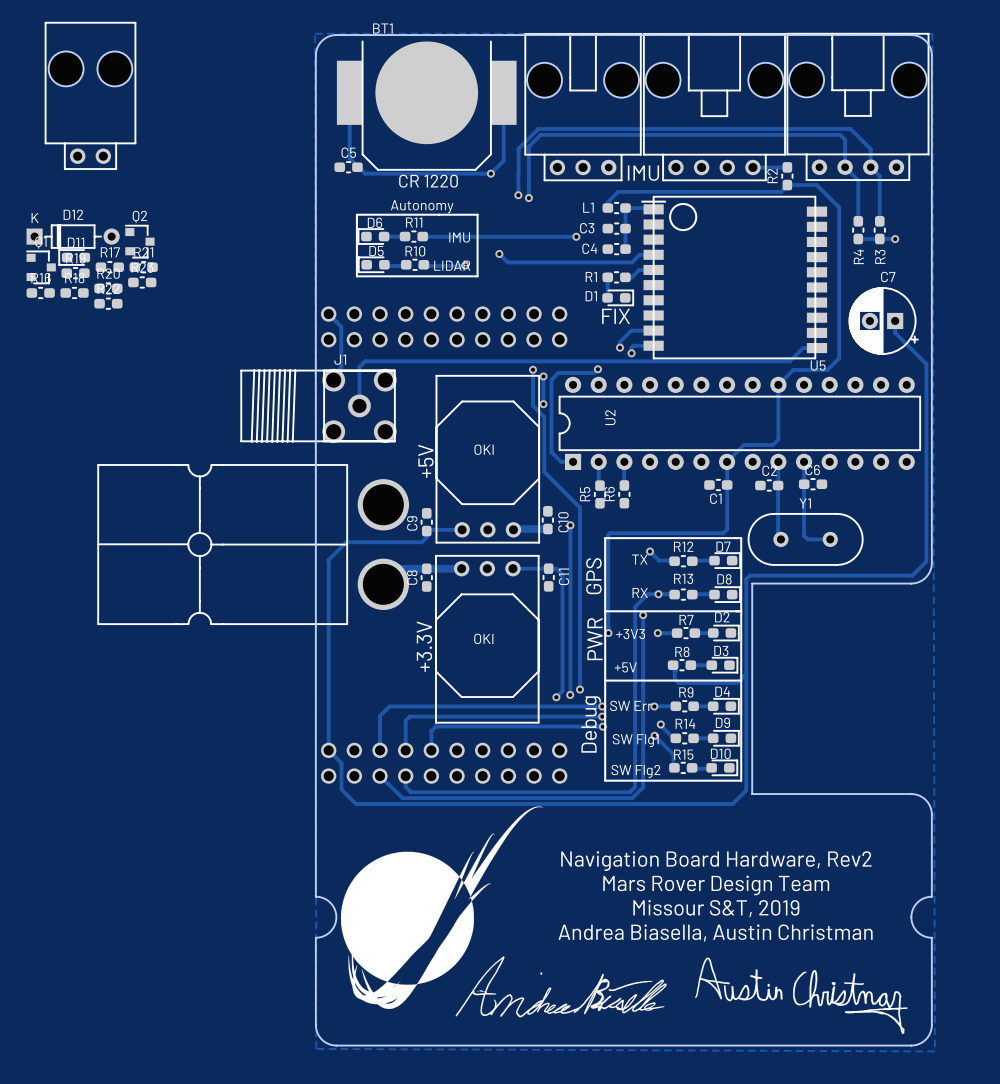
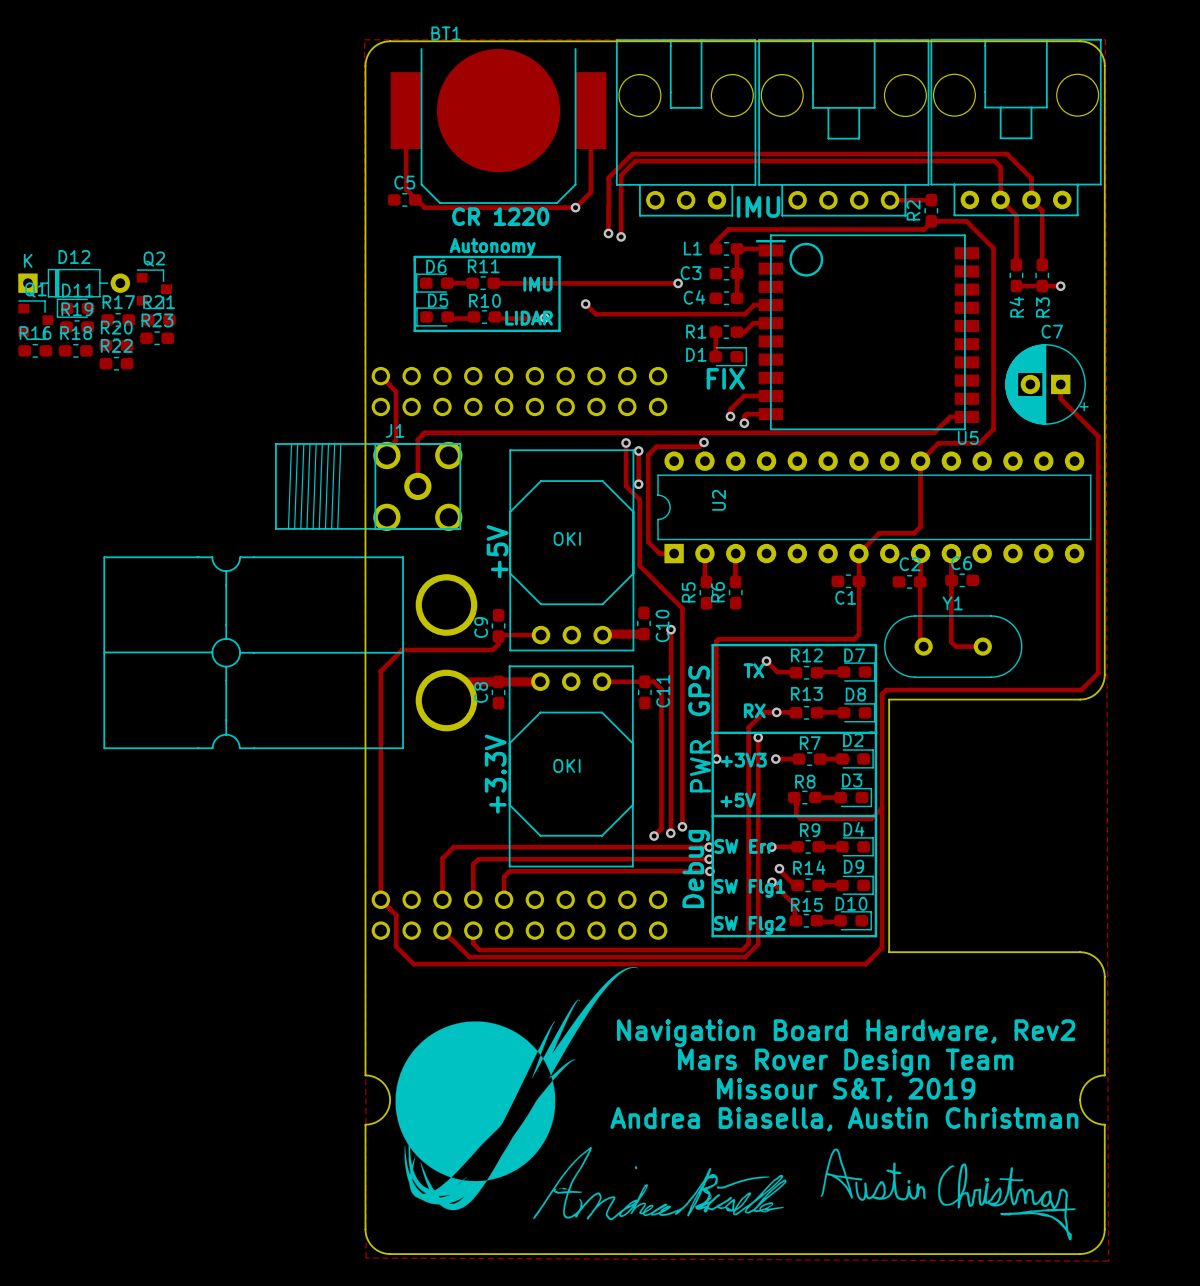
part: (90, 95) -> none

